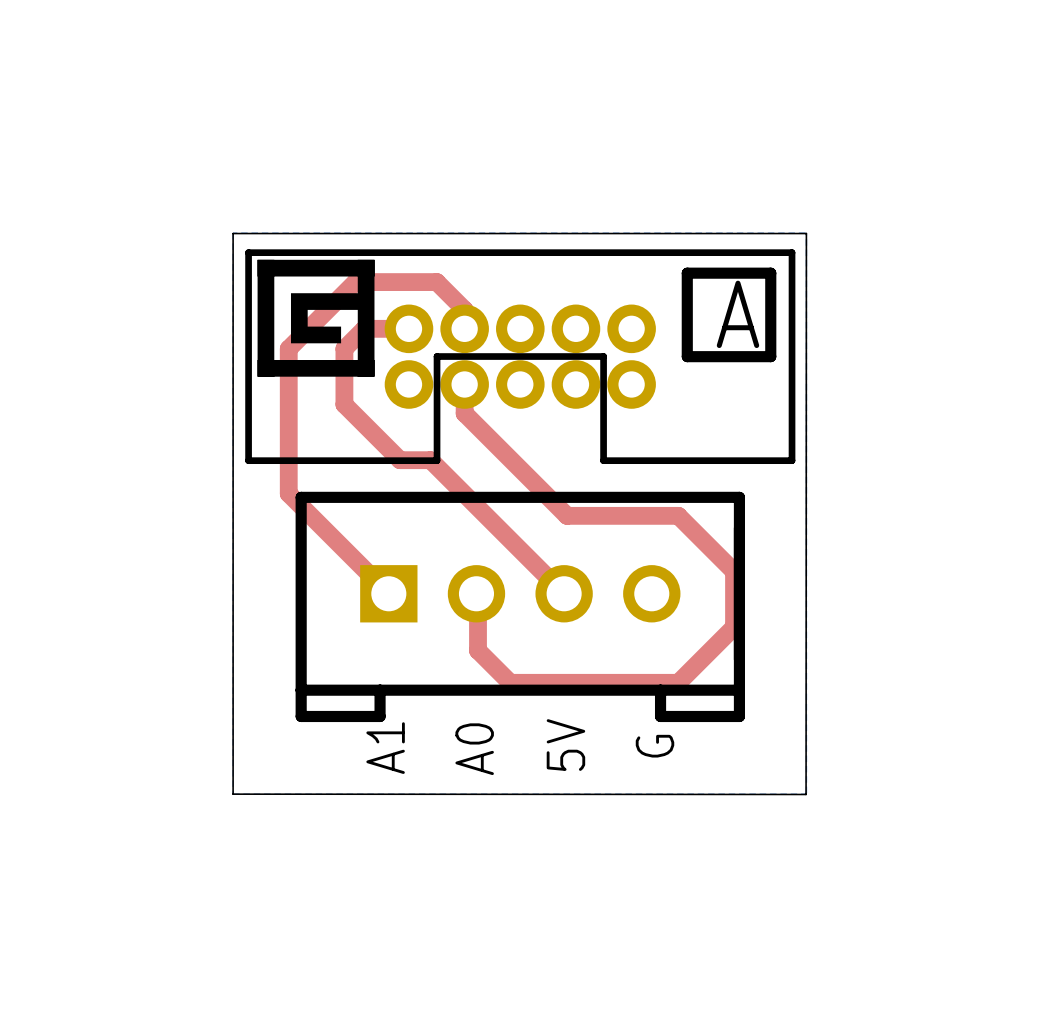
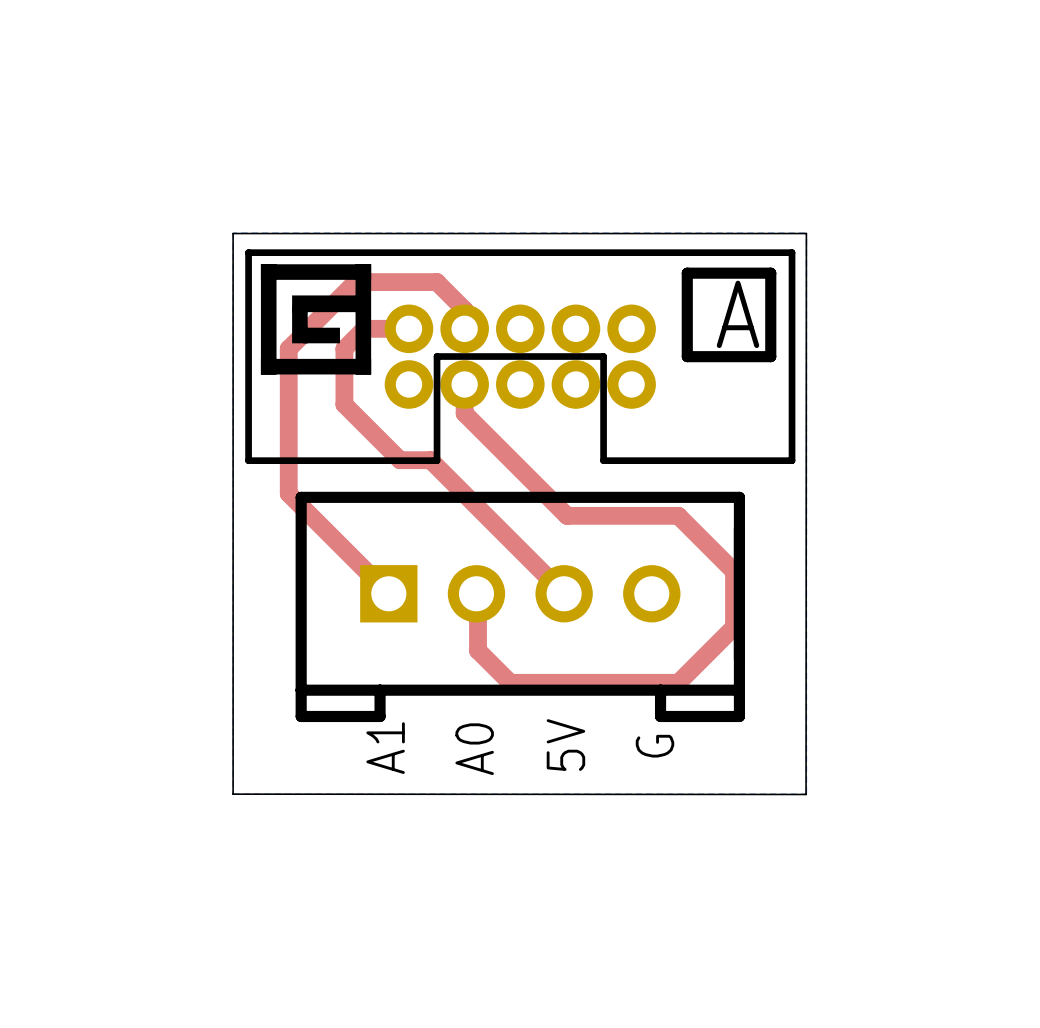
drawing: [257, 259, 375, 377] -> none
drawing: none -> [260, 264, 372, 375]

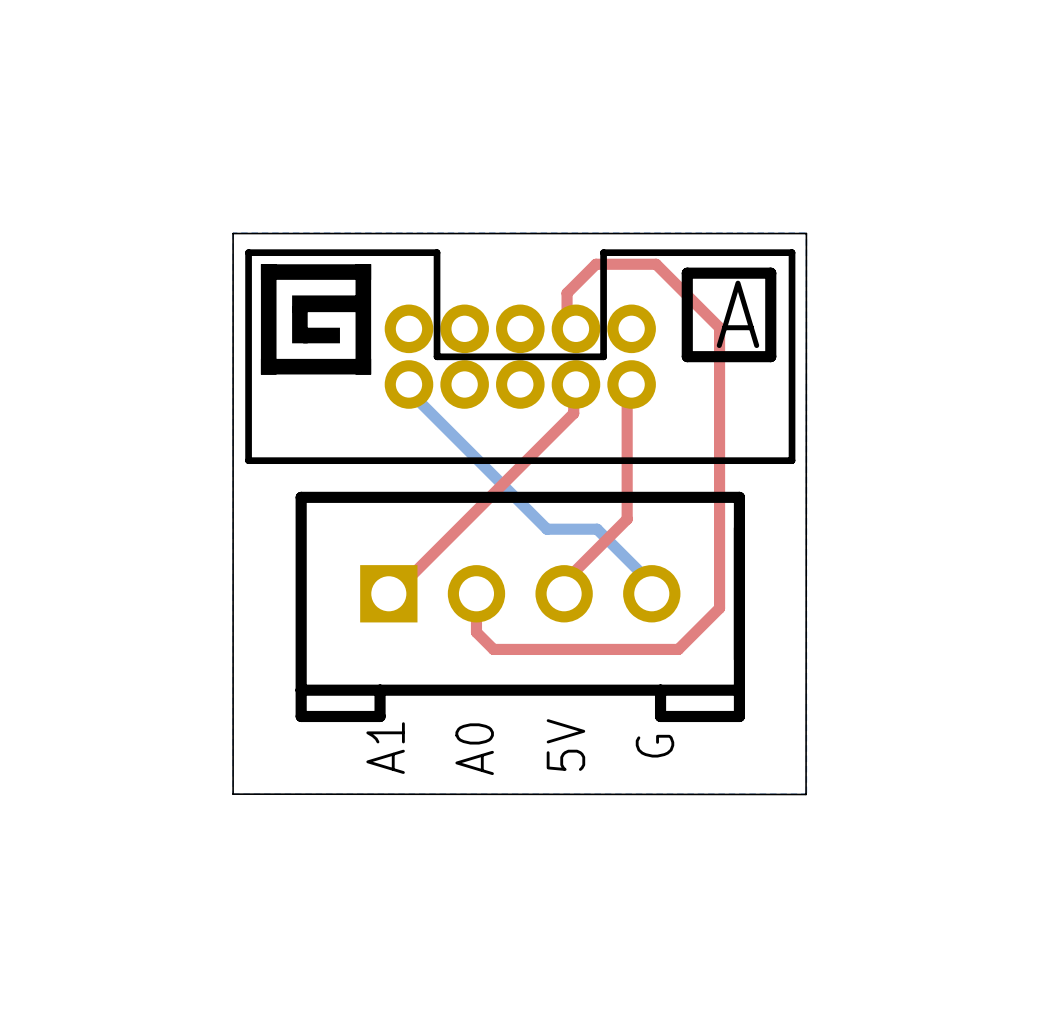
top track: (408, 328) (364, 328) (344, 348) (344, 404) (400, 460) (430, 460) (564, 593) -> (631, 384) (627, 388) (627, 519) (567, 579) (564, 593)
top track: (464, 328) (464, 309) (436, 282) (355, 282) (288, 348) (288, 493) (388, 593) -> (575, 384) (573, 393) (573, 413) (393, 593) (388, 593)
part rotation: 0° (520, 356) -> 180° (520, 356)
bottom track: none -> (408, 384) (416, 388) (416, 398) (547, 529) (597, 529) (647, 579) (651, 593)
top track: (464, 384) (464, 413) (567, 515) (678, 515) (734, 571) (734, 627) (678, 682) (510, 682) (478, 650) (476, 593) -> (575, 328) (567, 319) (567, 293) (596, 264) (656, 264) (719, 327) (719, 608) (678, 649) (493, 649) (476, 632) (476, 593)

